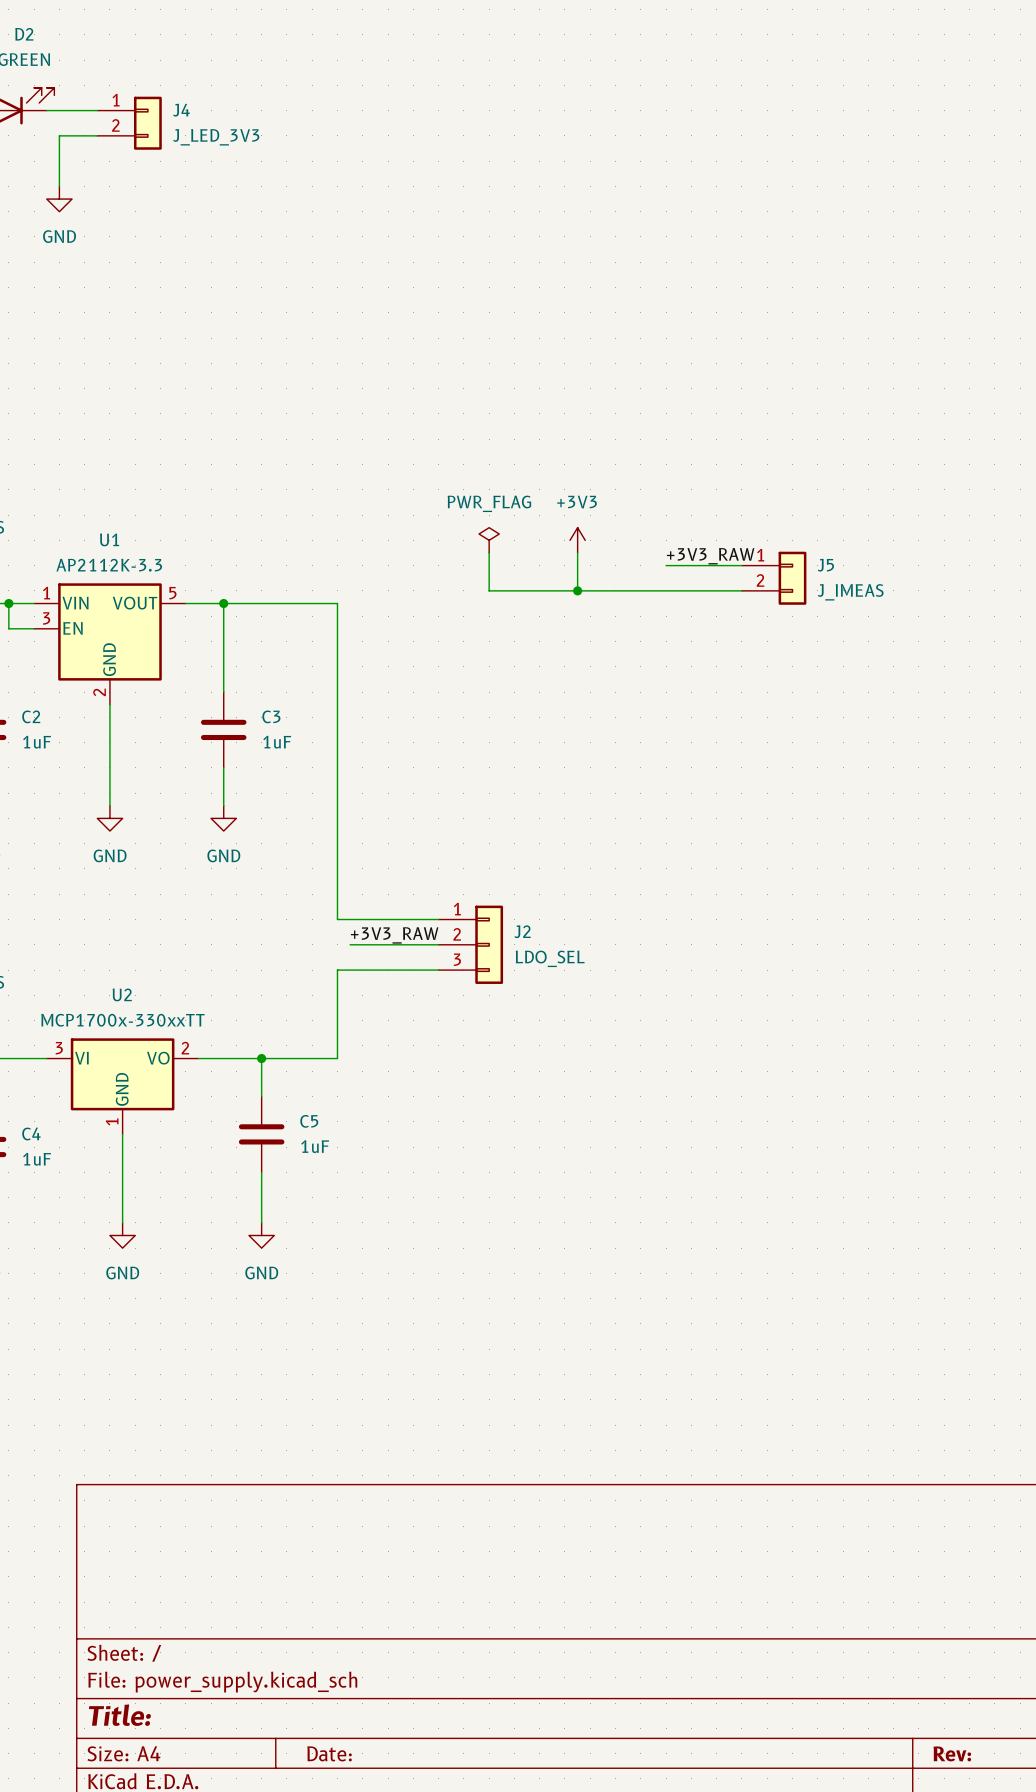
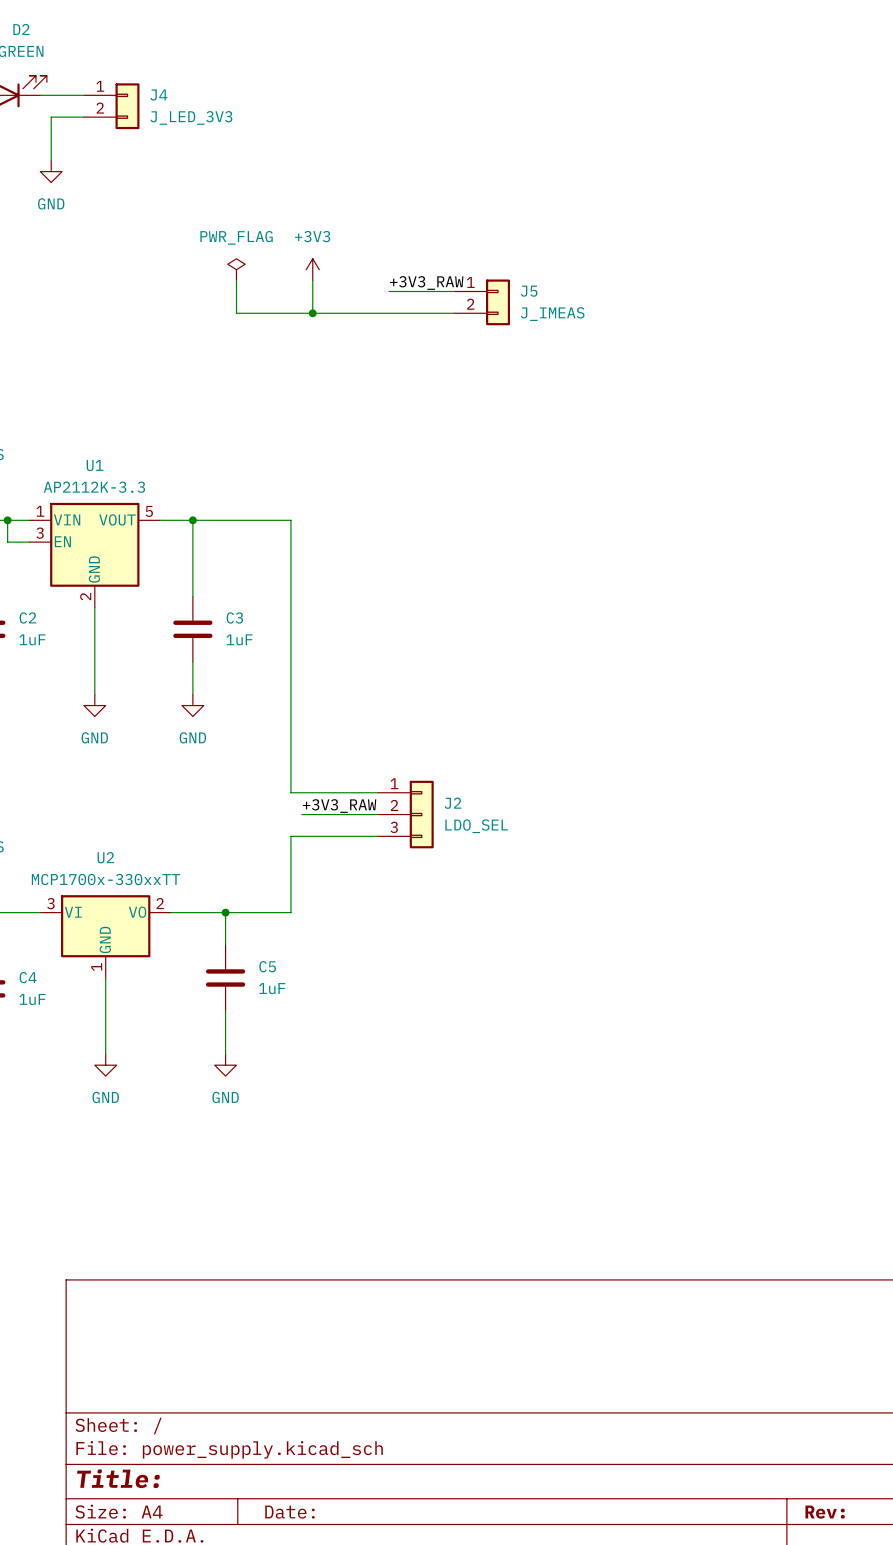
power symbol: none -> PWR_FLAG (236, 269)
power symbol: none -> +3V3 (312, 269)
wire: none -> (236, 280) (236, 313) (454, 313)
wire: none -> (312, 280) (312, 313)
label: none -> +3V3_RAW (426, 282)
wire: none -> (389, 291) (454, 291)
junction: none -> (312, 313)
power symbol: PWR_FLAG (489, 540) -> none
power symbol: +3V3 (577, 540) -> none
wire: (489, 552) (489, 590) (741, 590) -> none
wire: (577, 552) (577, 590) -> none
label: +3V3_RAW (710, 556) -> none
wire: (666, 565) (741, 565) -> none
J5 position: (774, 578) -> (482, 302)
junction: (577, 590) -> none

